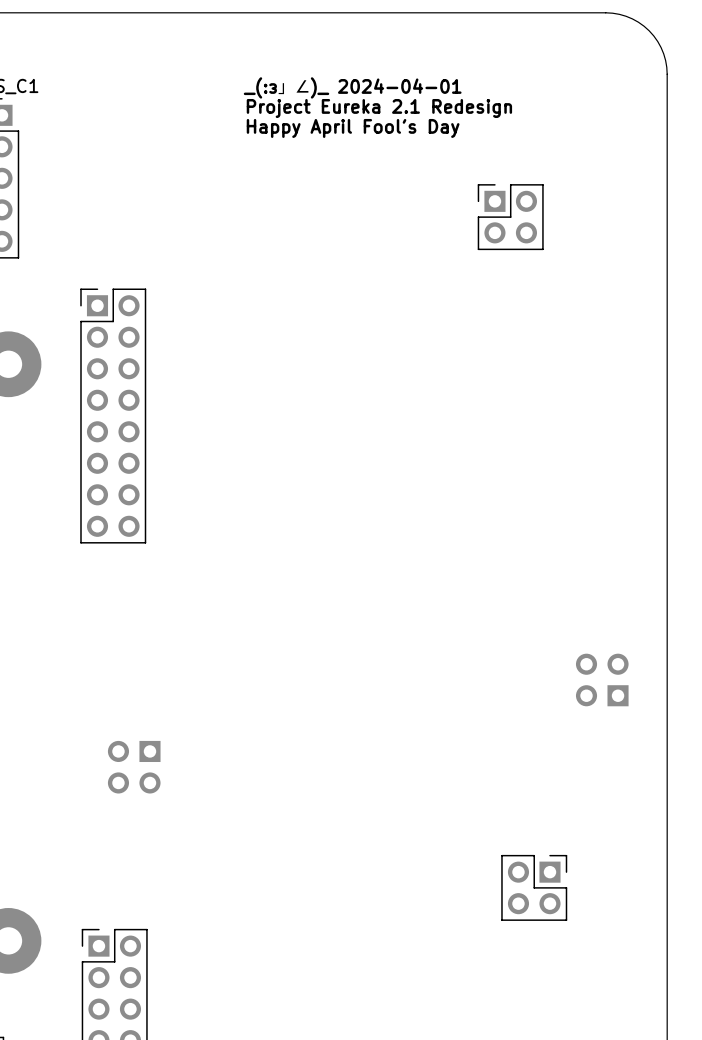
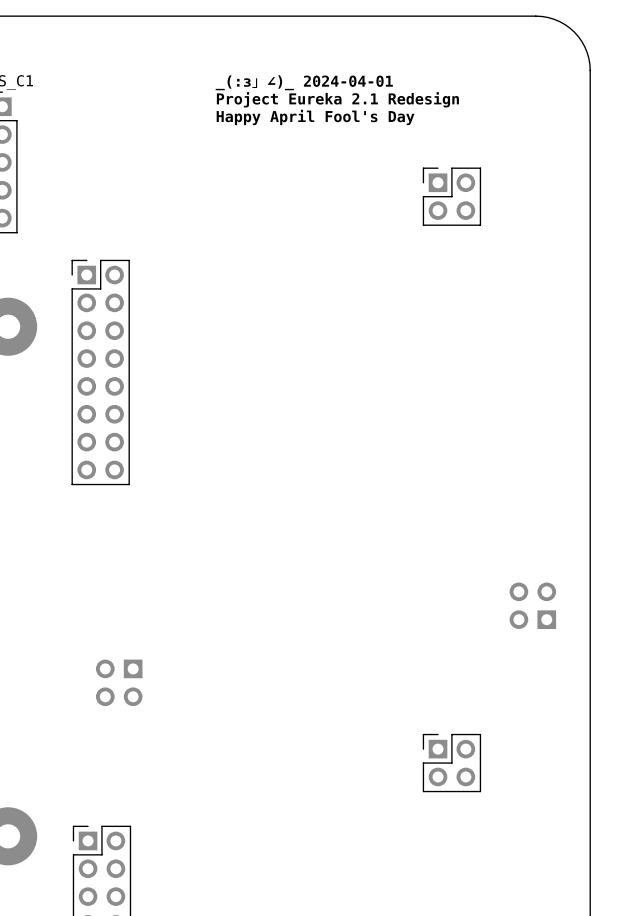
part rotation: 0° (534, 887) -> 90° counterclockwise (451, 763)

